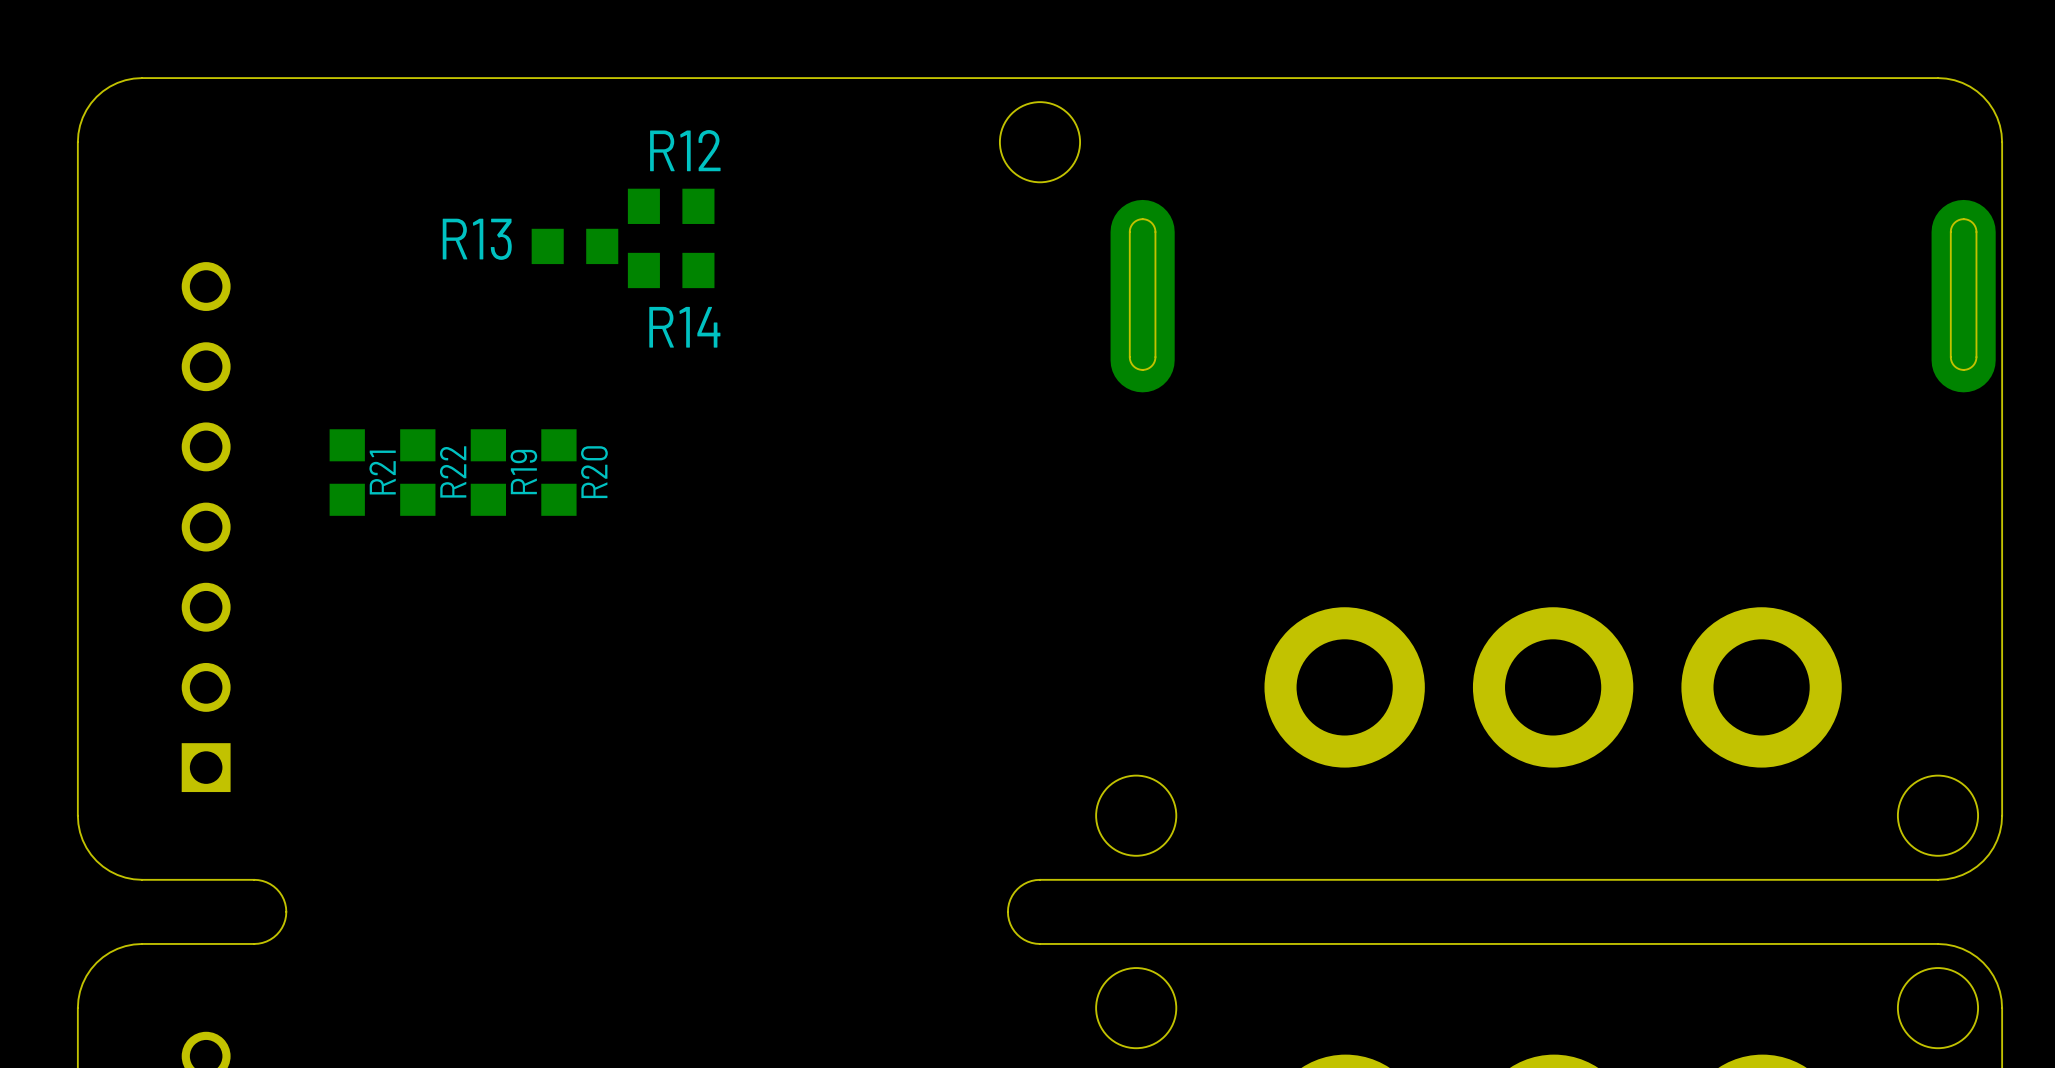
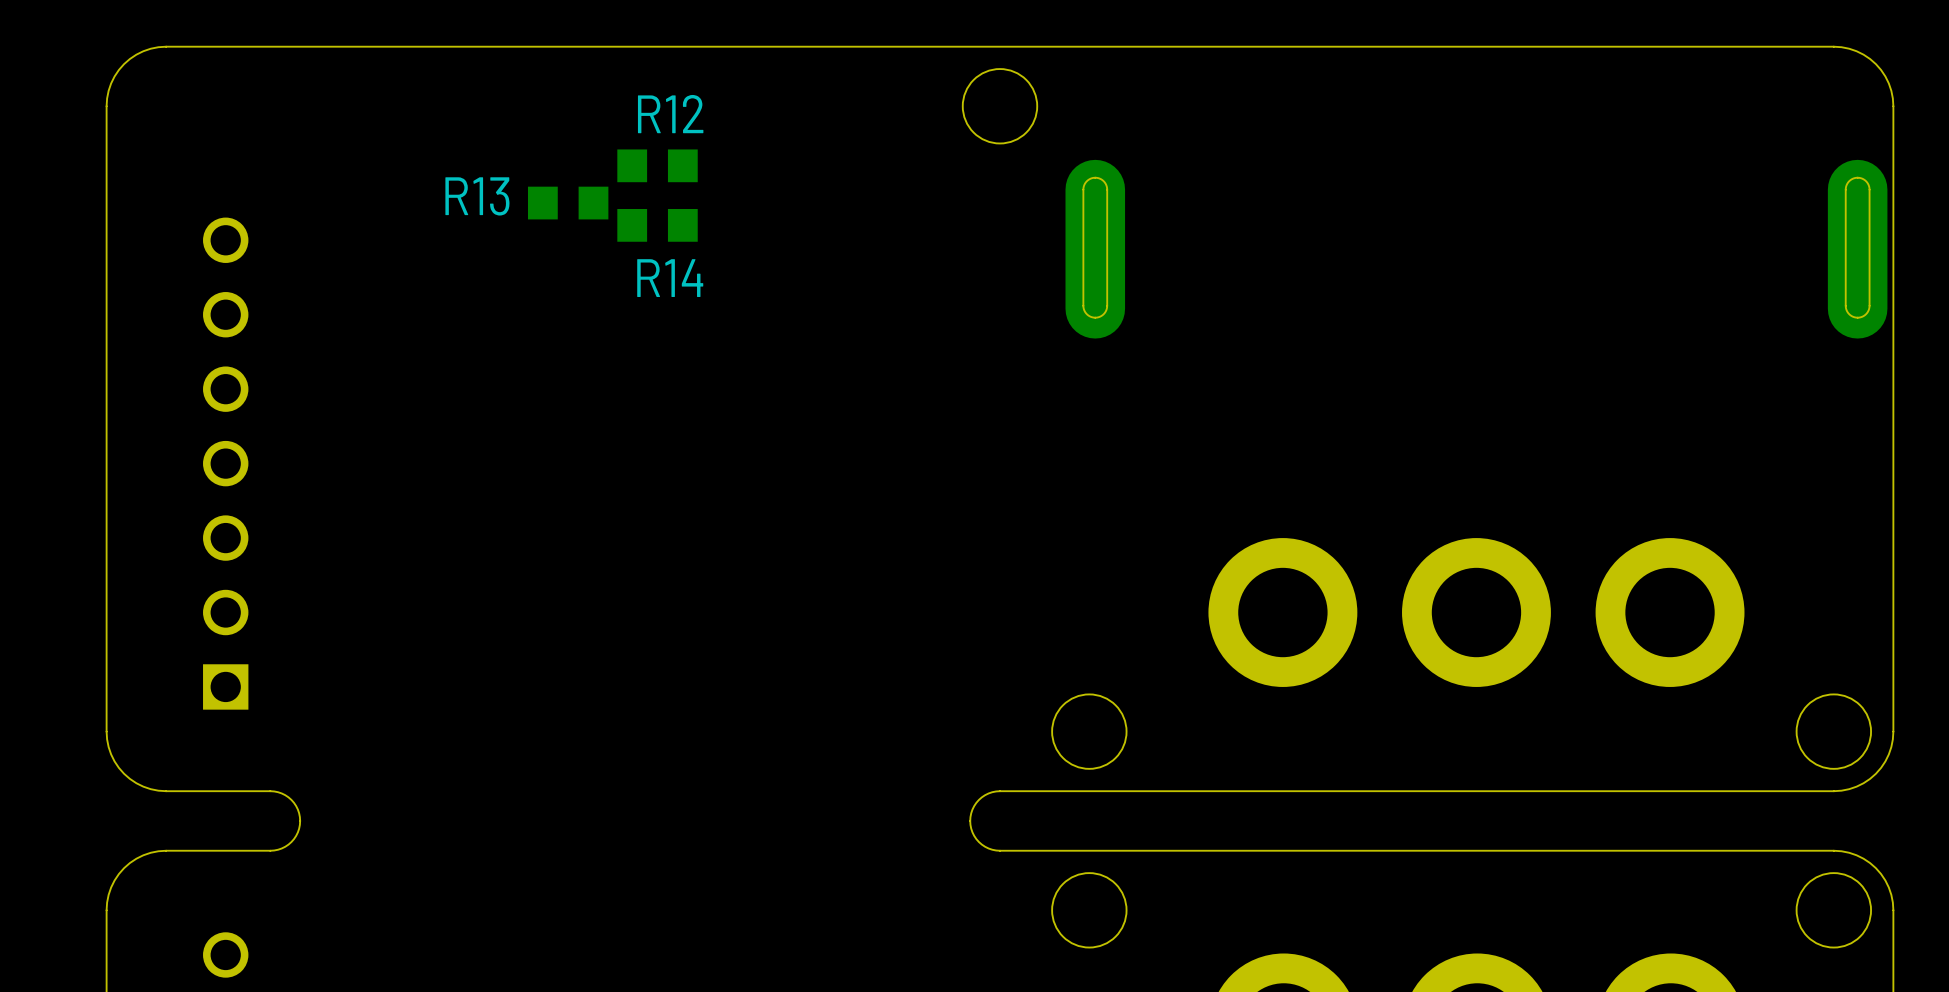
R21: (347, 472) -> none
R22: (417, 472) -> none
R19: (488, 472) -> none
R20: (558, 472) -> none

